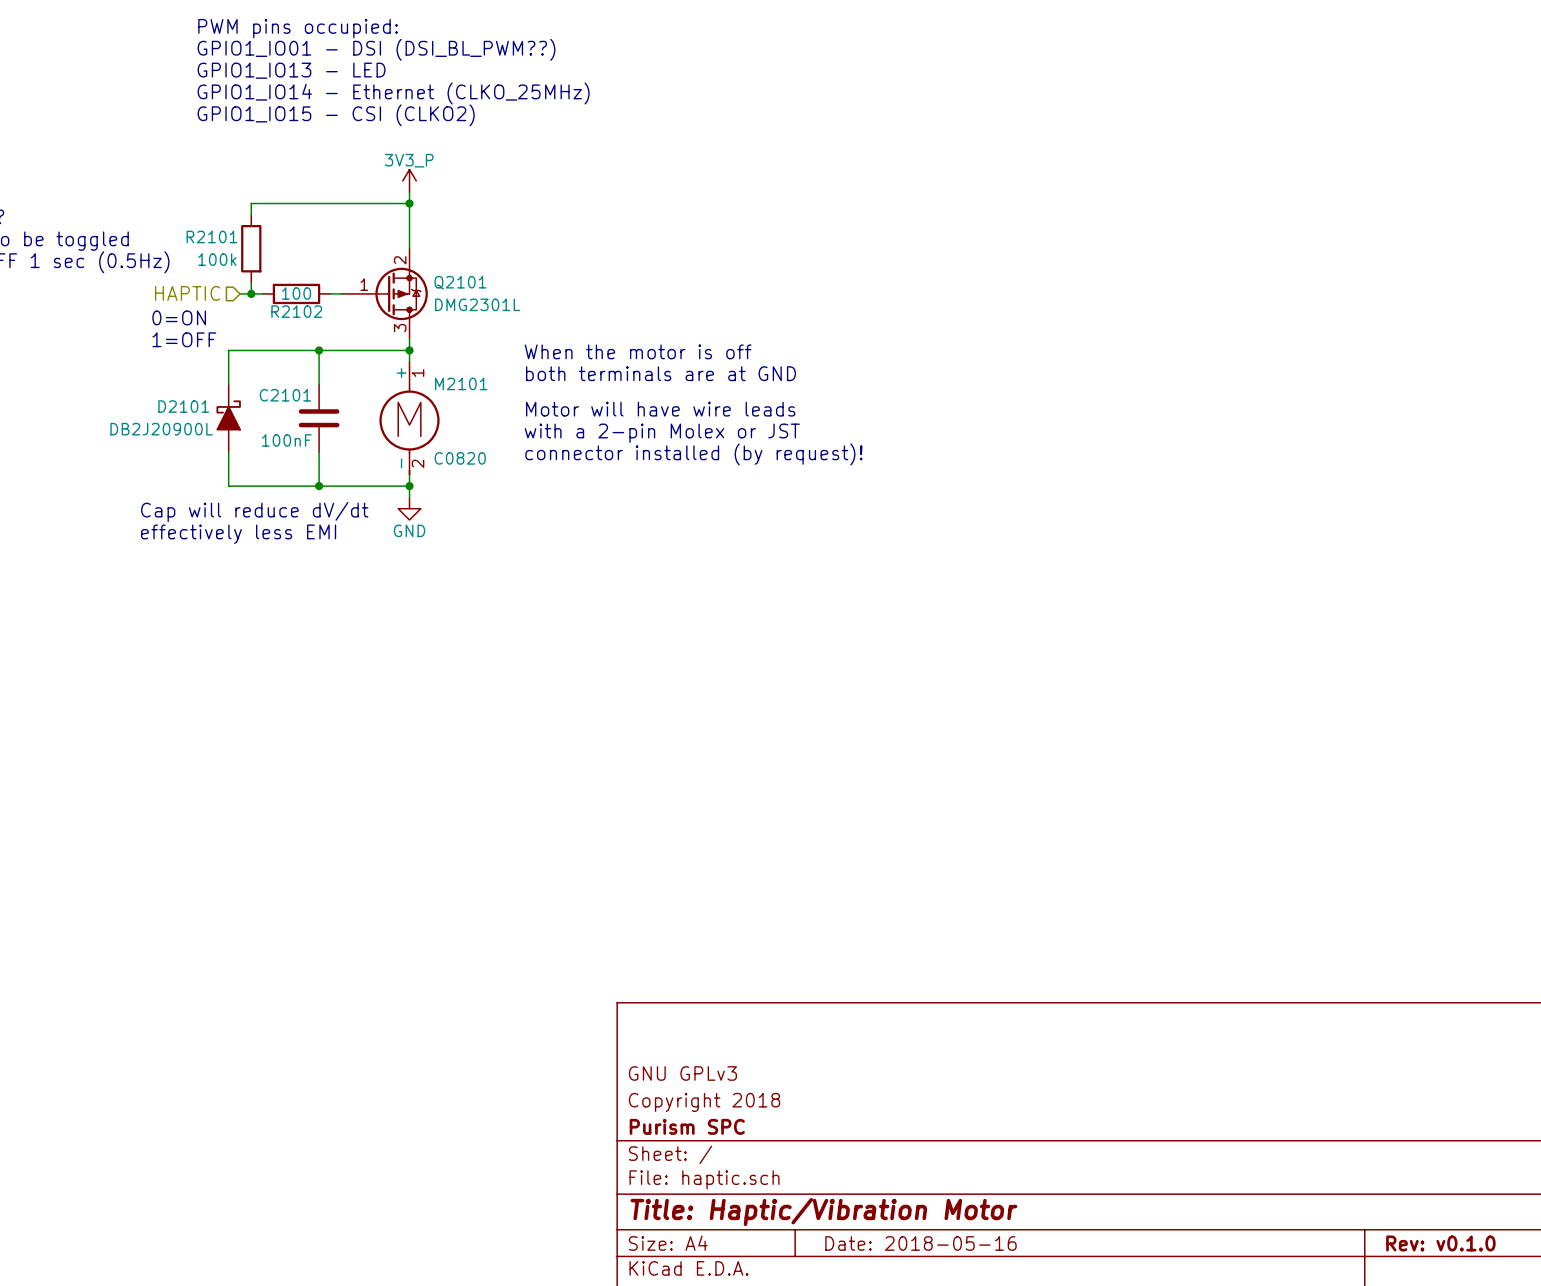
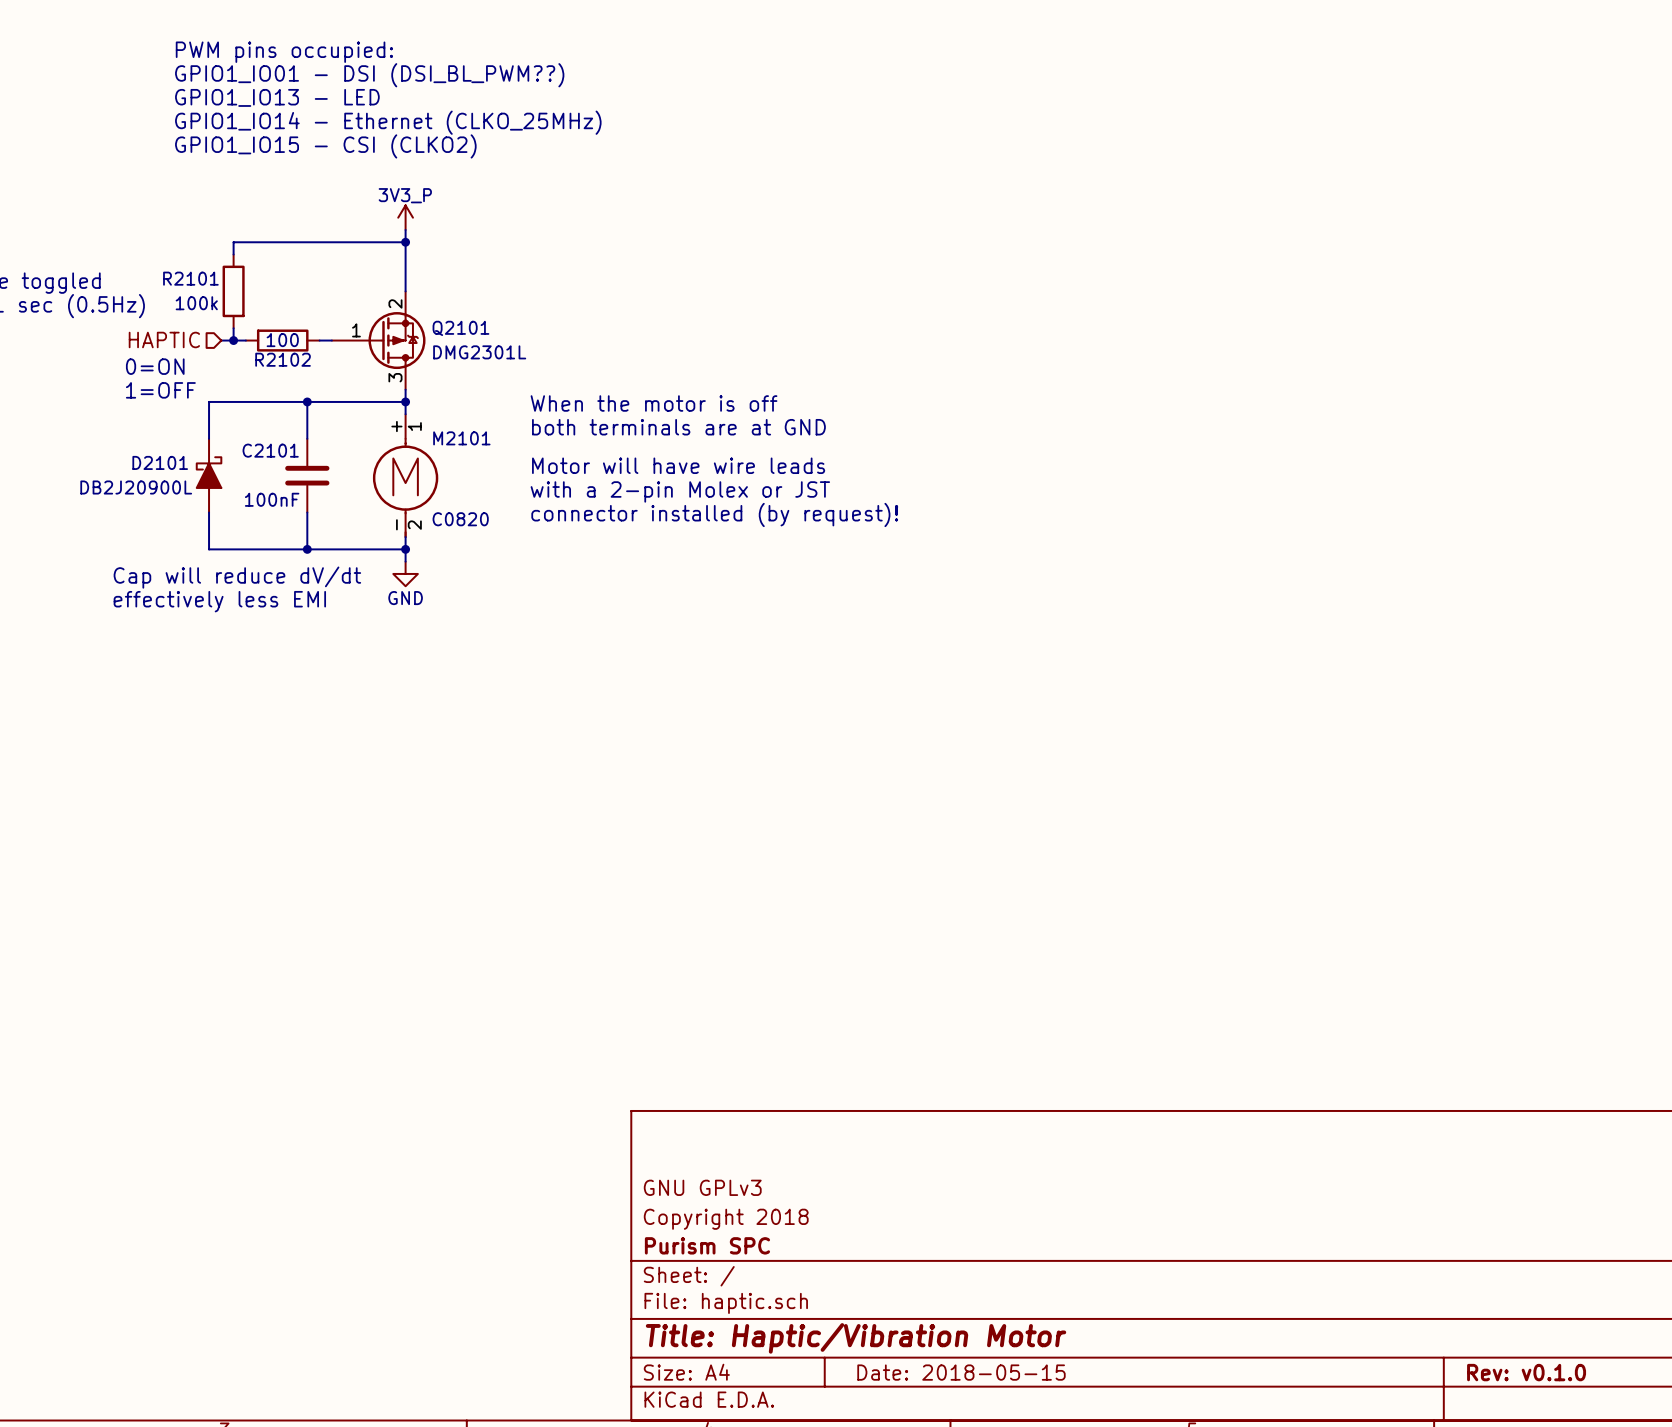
title block: Date: 2018-05-16 (920, 1243) -> Date: 2018-05-15 (961, 1372)

